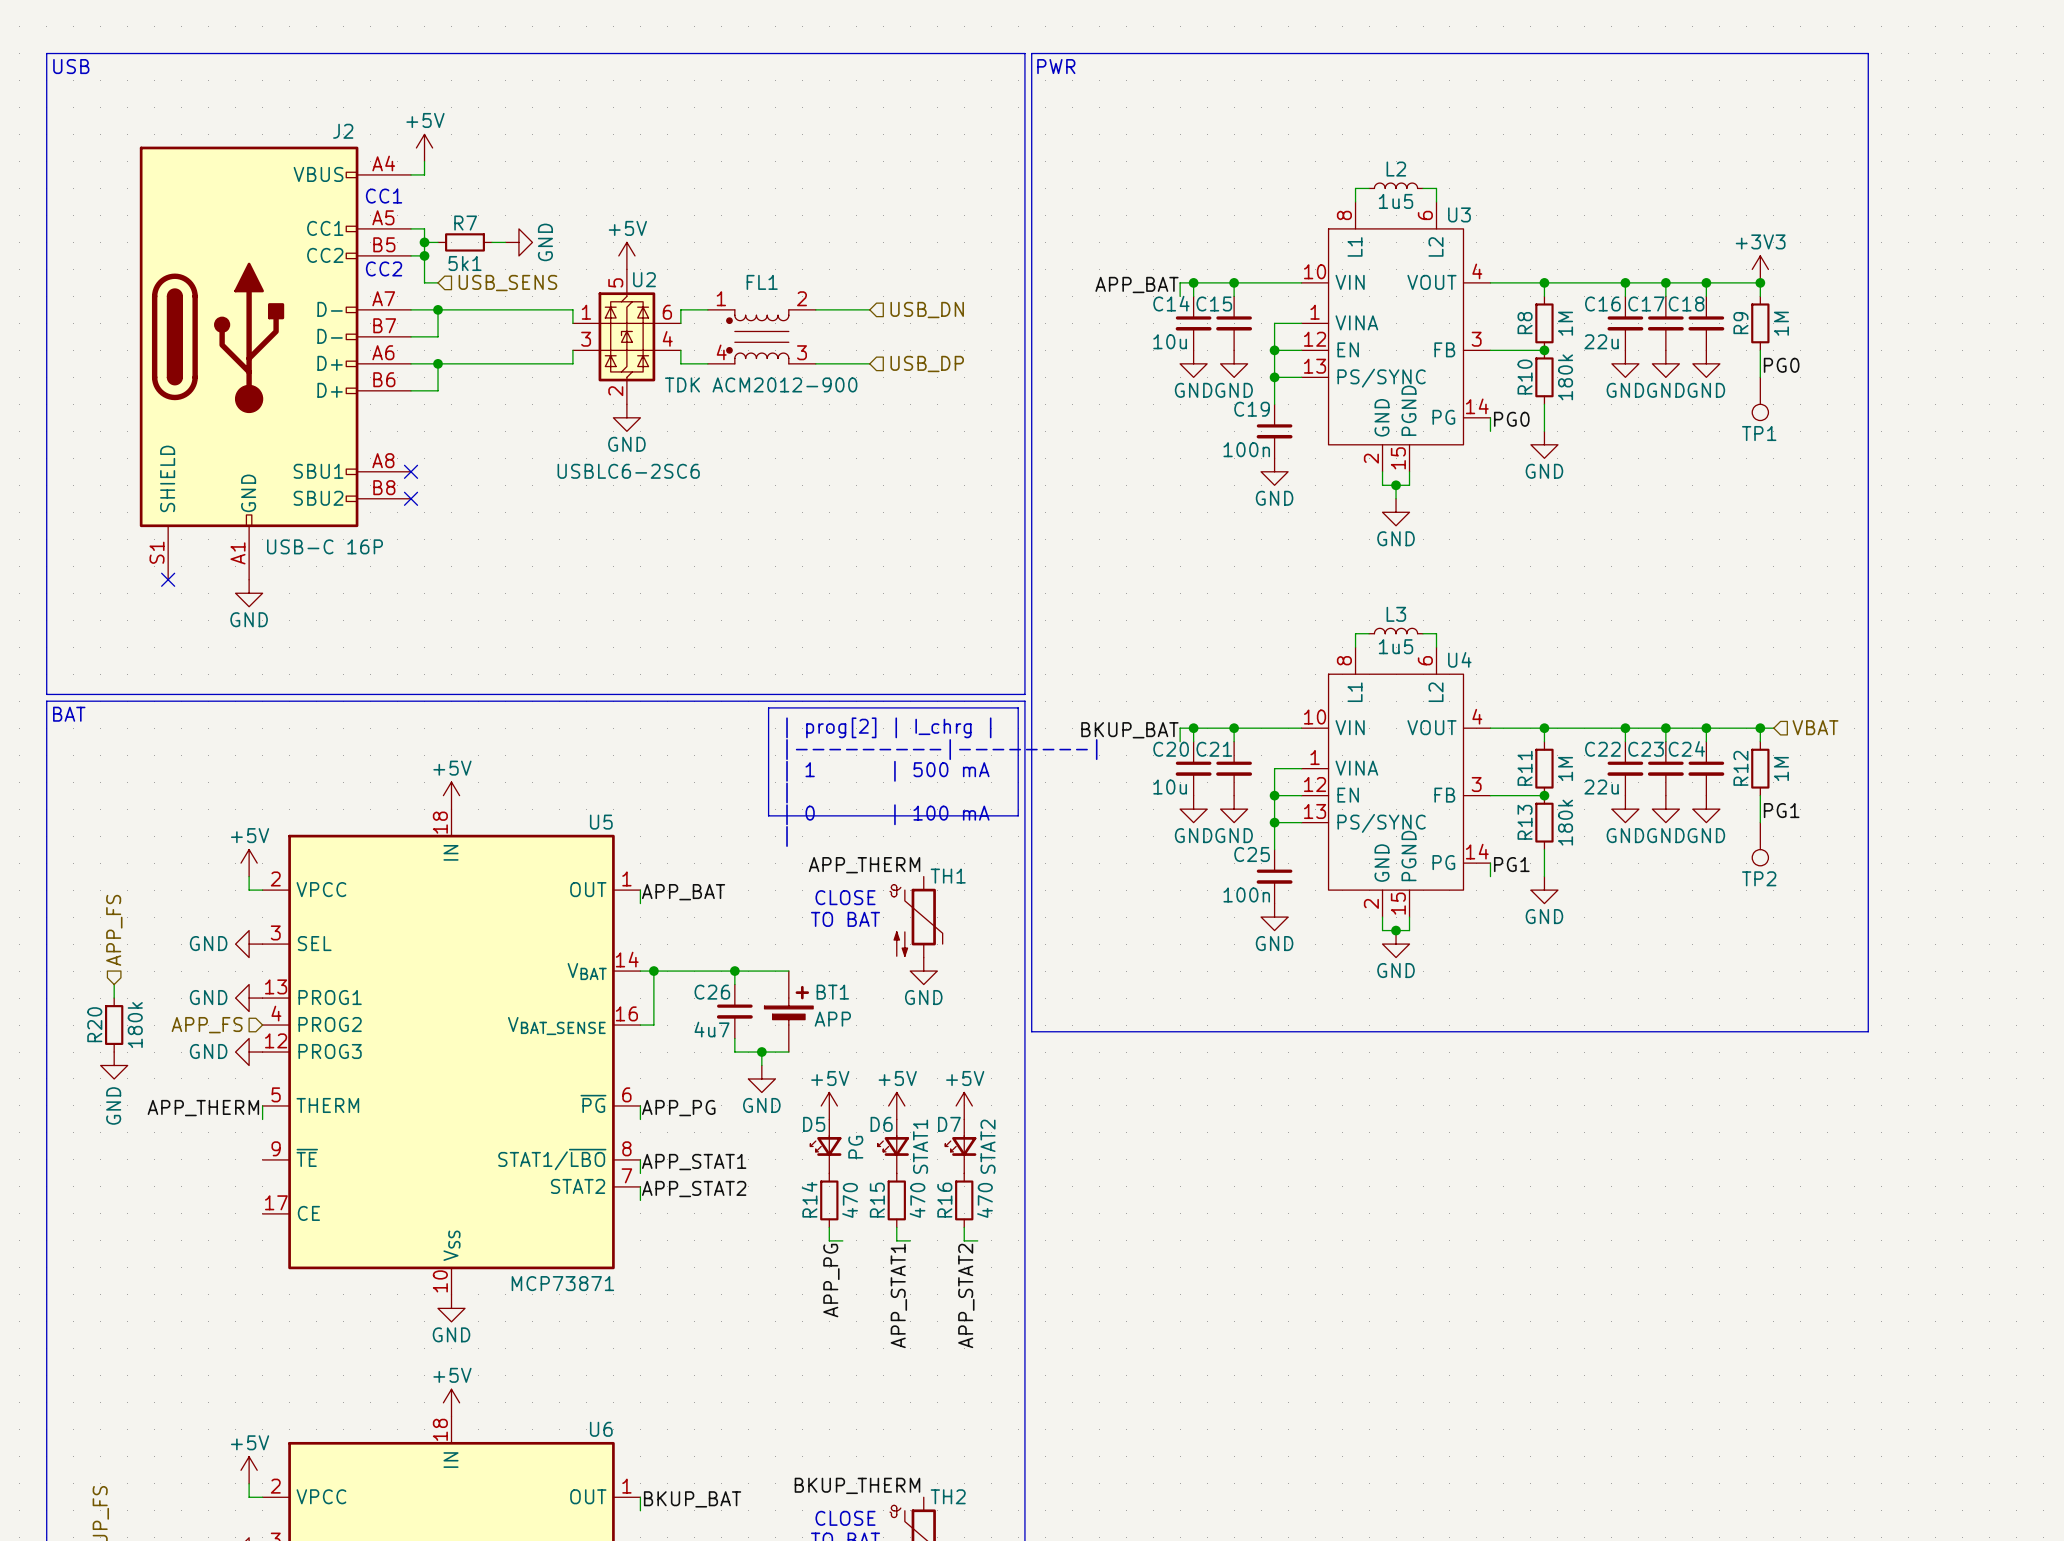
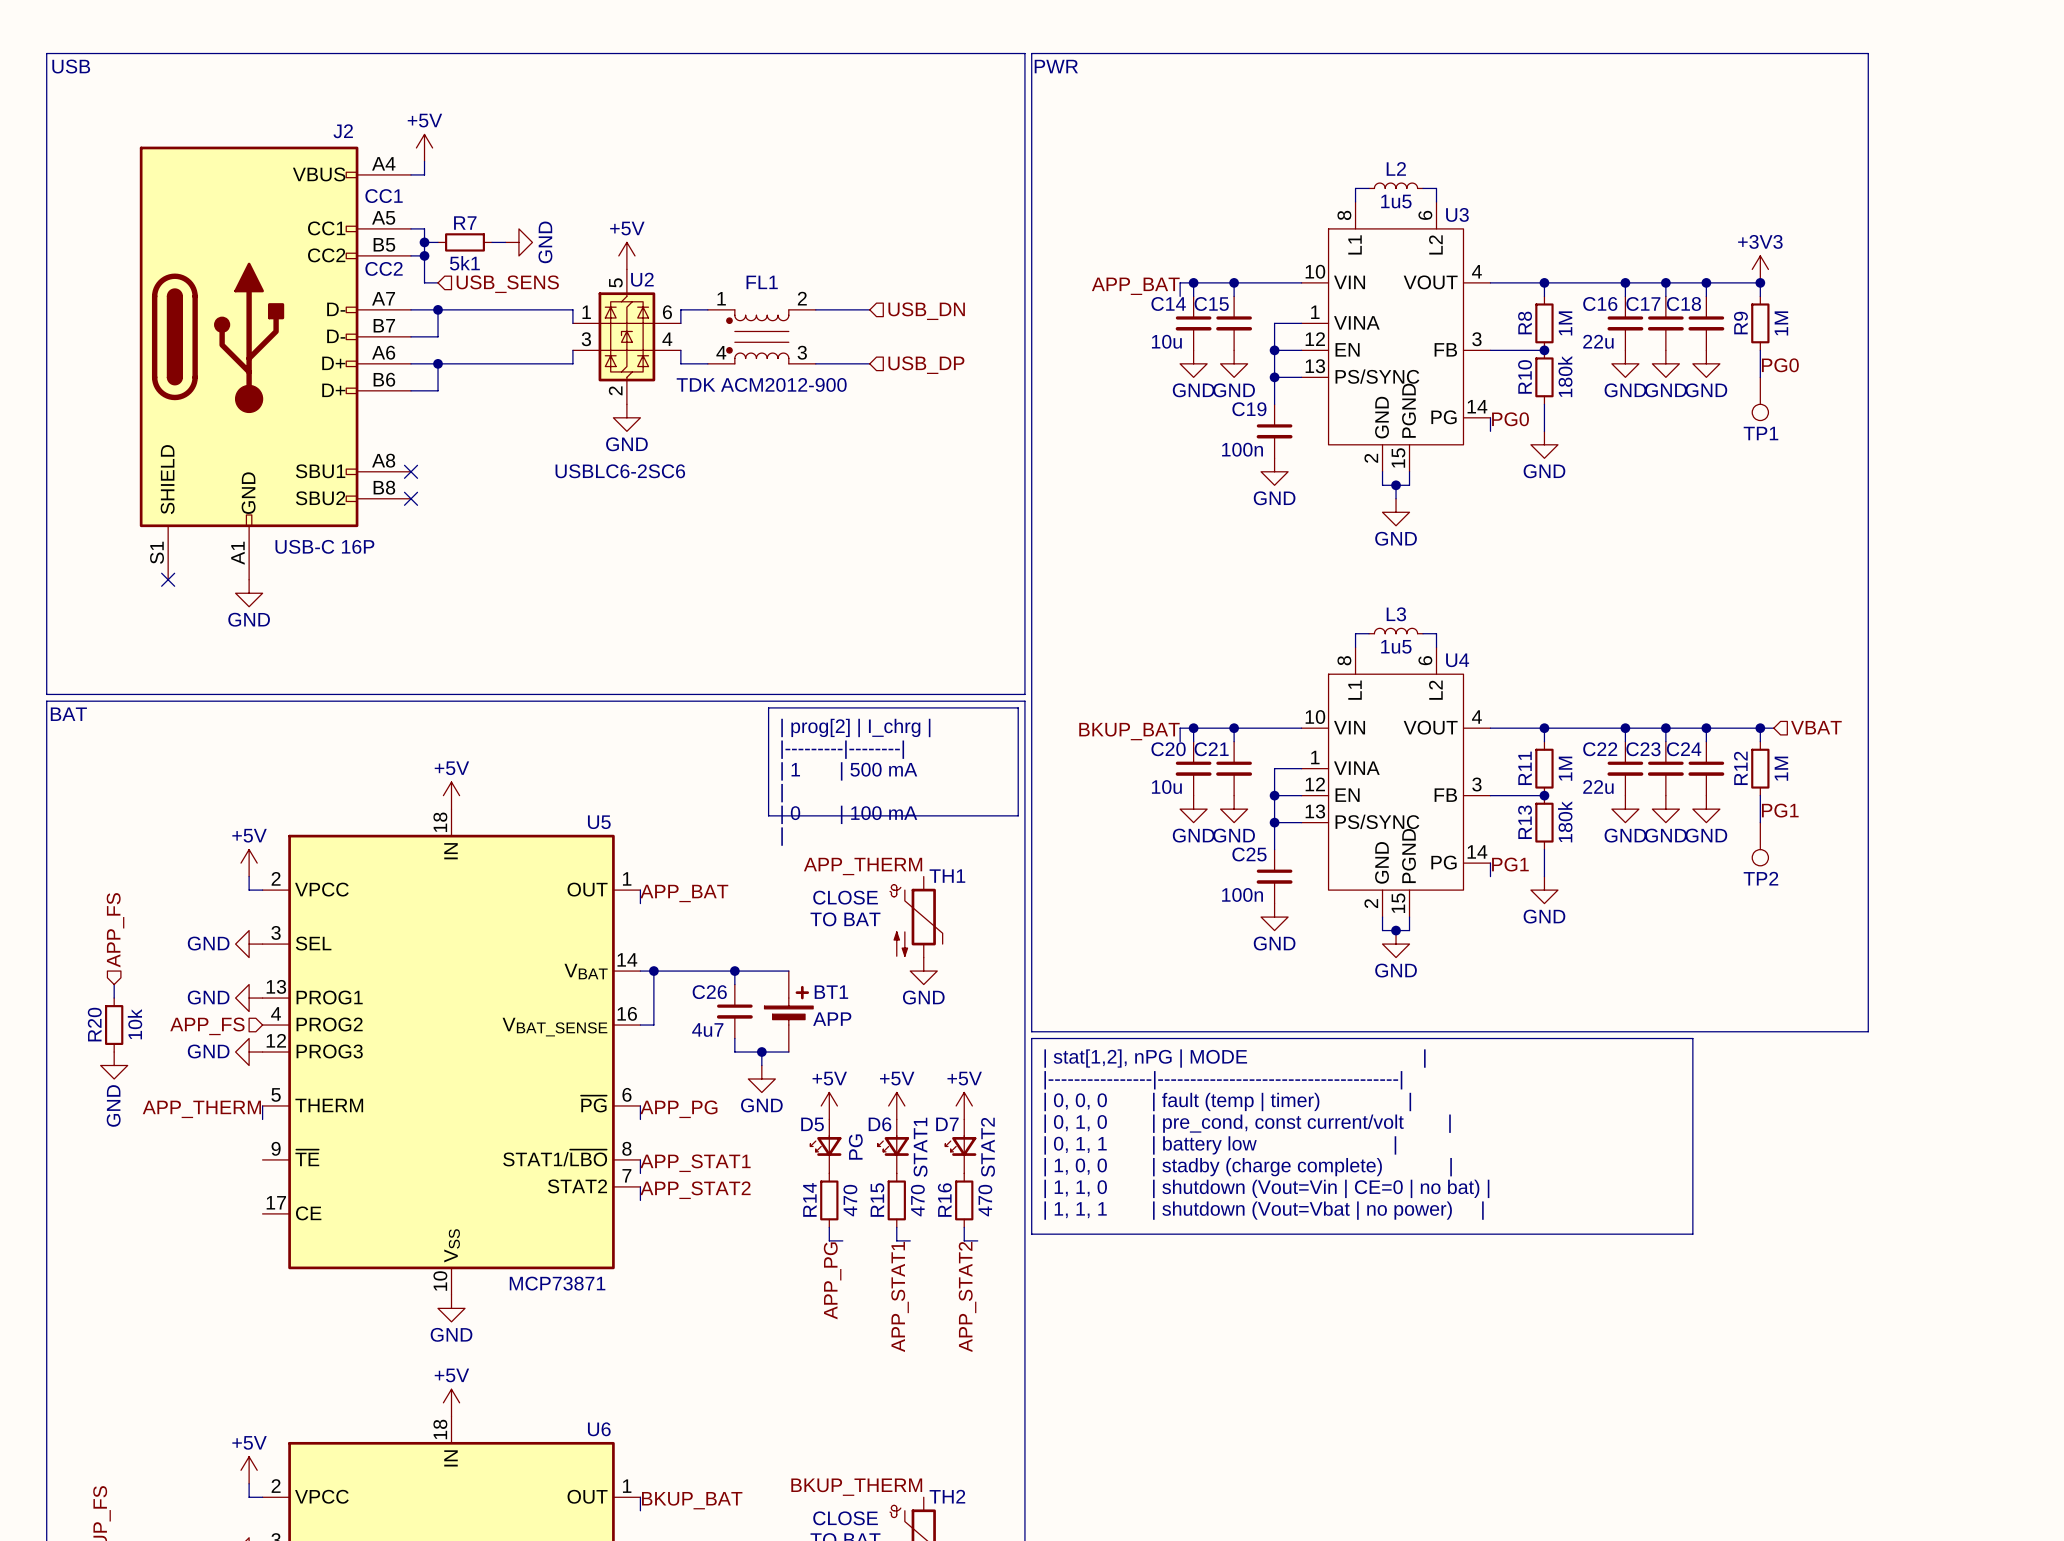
R20 value: 180k (135, 1025) -> 10k (134, 1024)
line: none -> (1031, 1038) (1692, 1038) (1692, 1234) (1031, 1234) (1031, 1038)
text: none -> | stat[1,2], nPG | MODE | (1235, 1058)
text: none -> |----------------|-------------------------------------| (1223, 1080)
text: none -> | 0, 0, 0 | fault (temp | timer) | (1227, 1101)
text: none -> | 0, 1, 0 | pre_cond, const current/volt | (1247, 1123)
text: none -> | 0, 1, 1 | battery low | (1220, 1145)
text: none -> | 1, 0, 0 | stadby (charge complete) | (1248, 1167)
text: none -> | 1, 1, 0 | shutdown (Vout=Vin | CE=0 | no bat) | (1266, 1188)
text: none -> | 1, 1, 1 | shutdown (Vout=Vbat | no power) | (1264, 1210)

